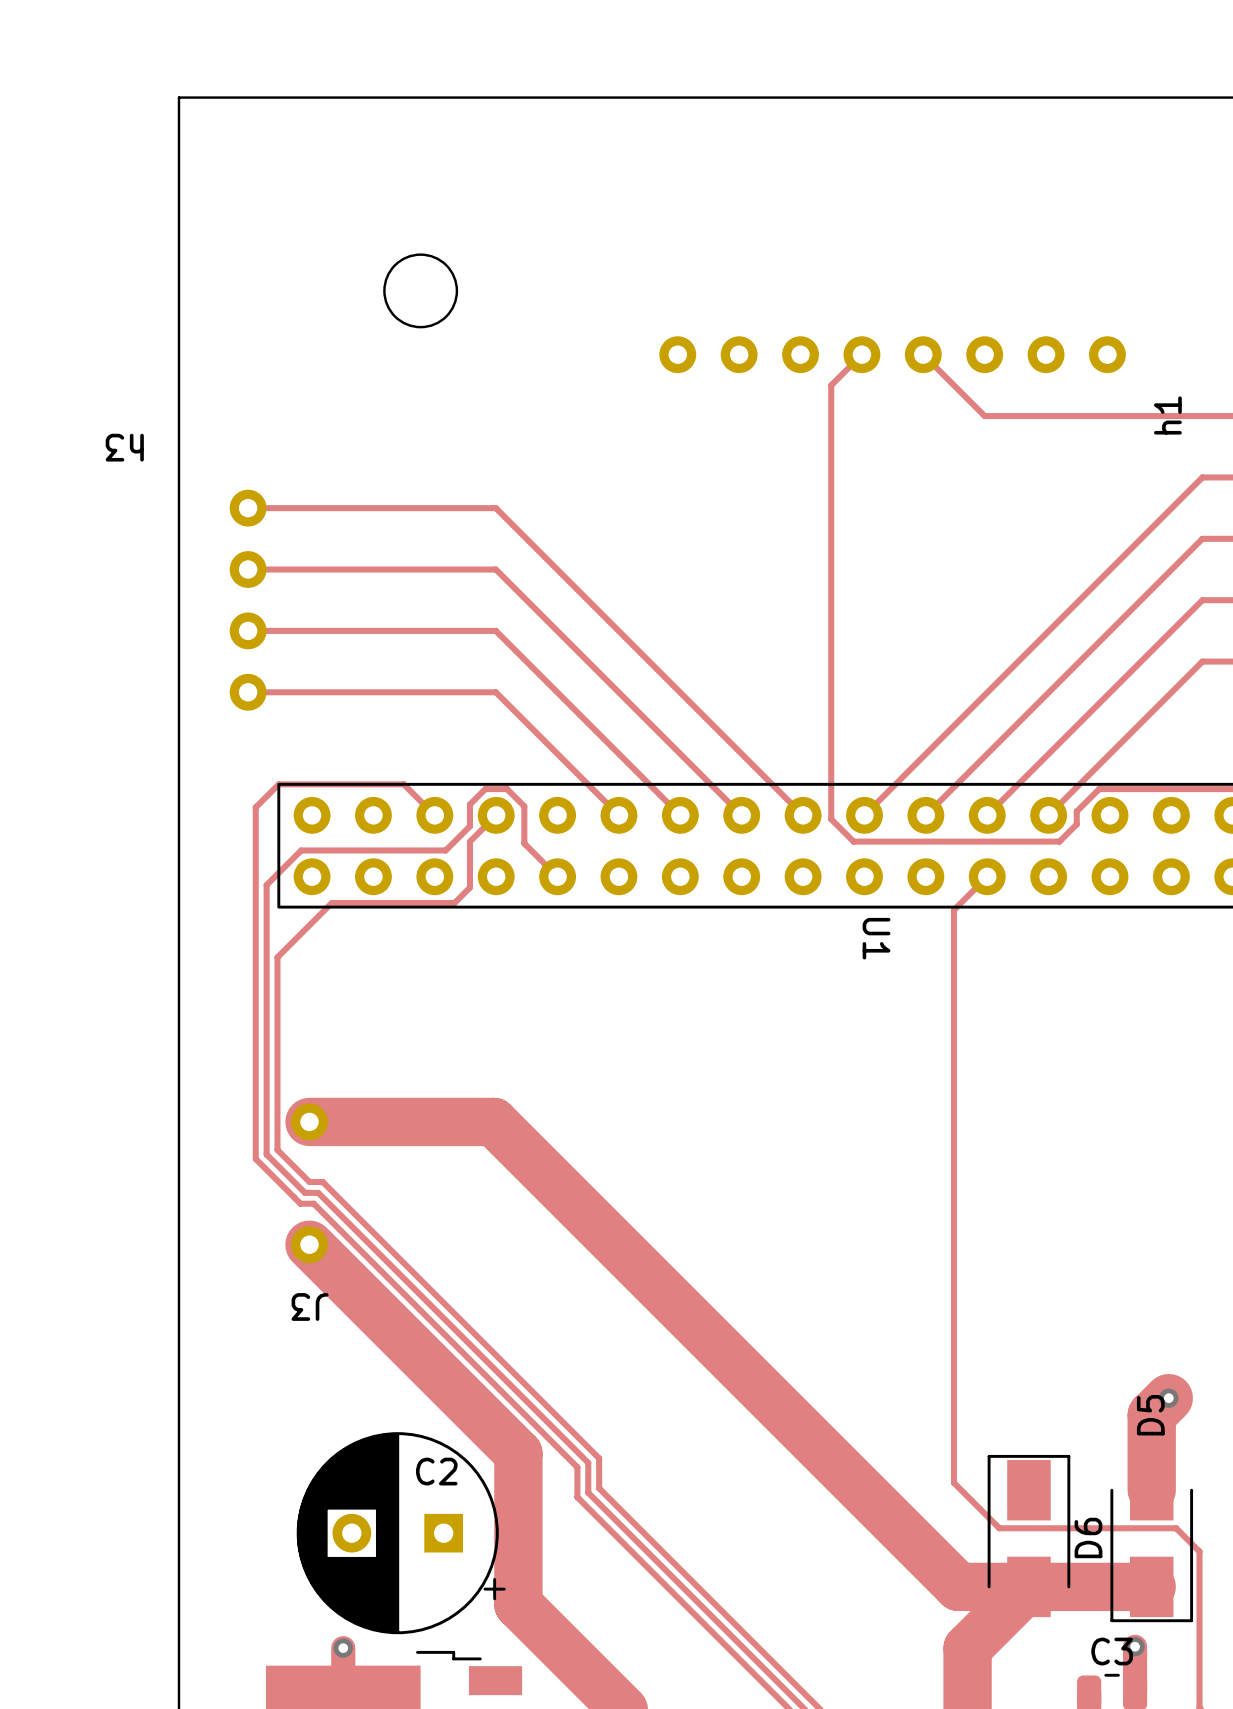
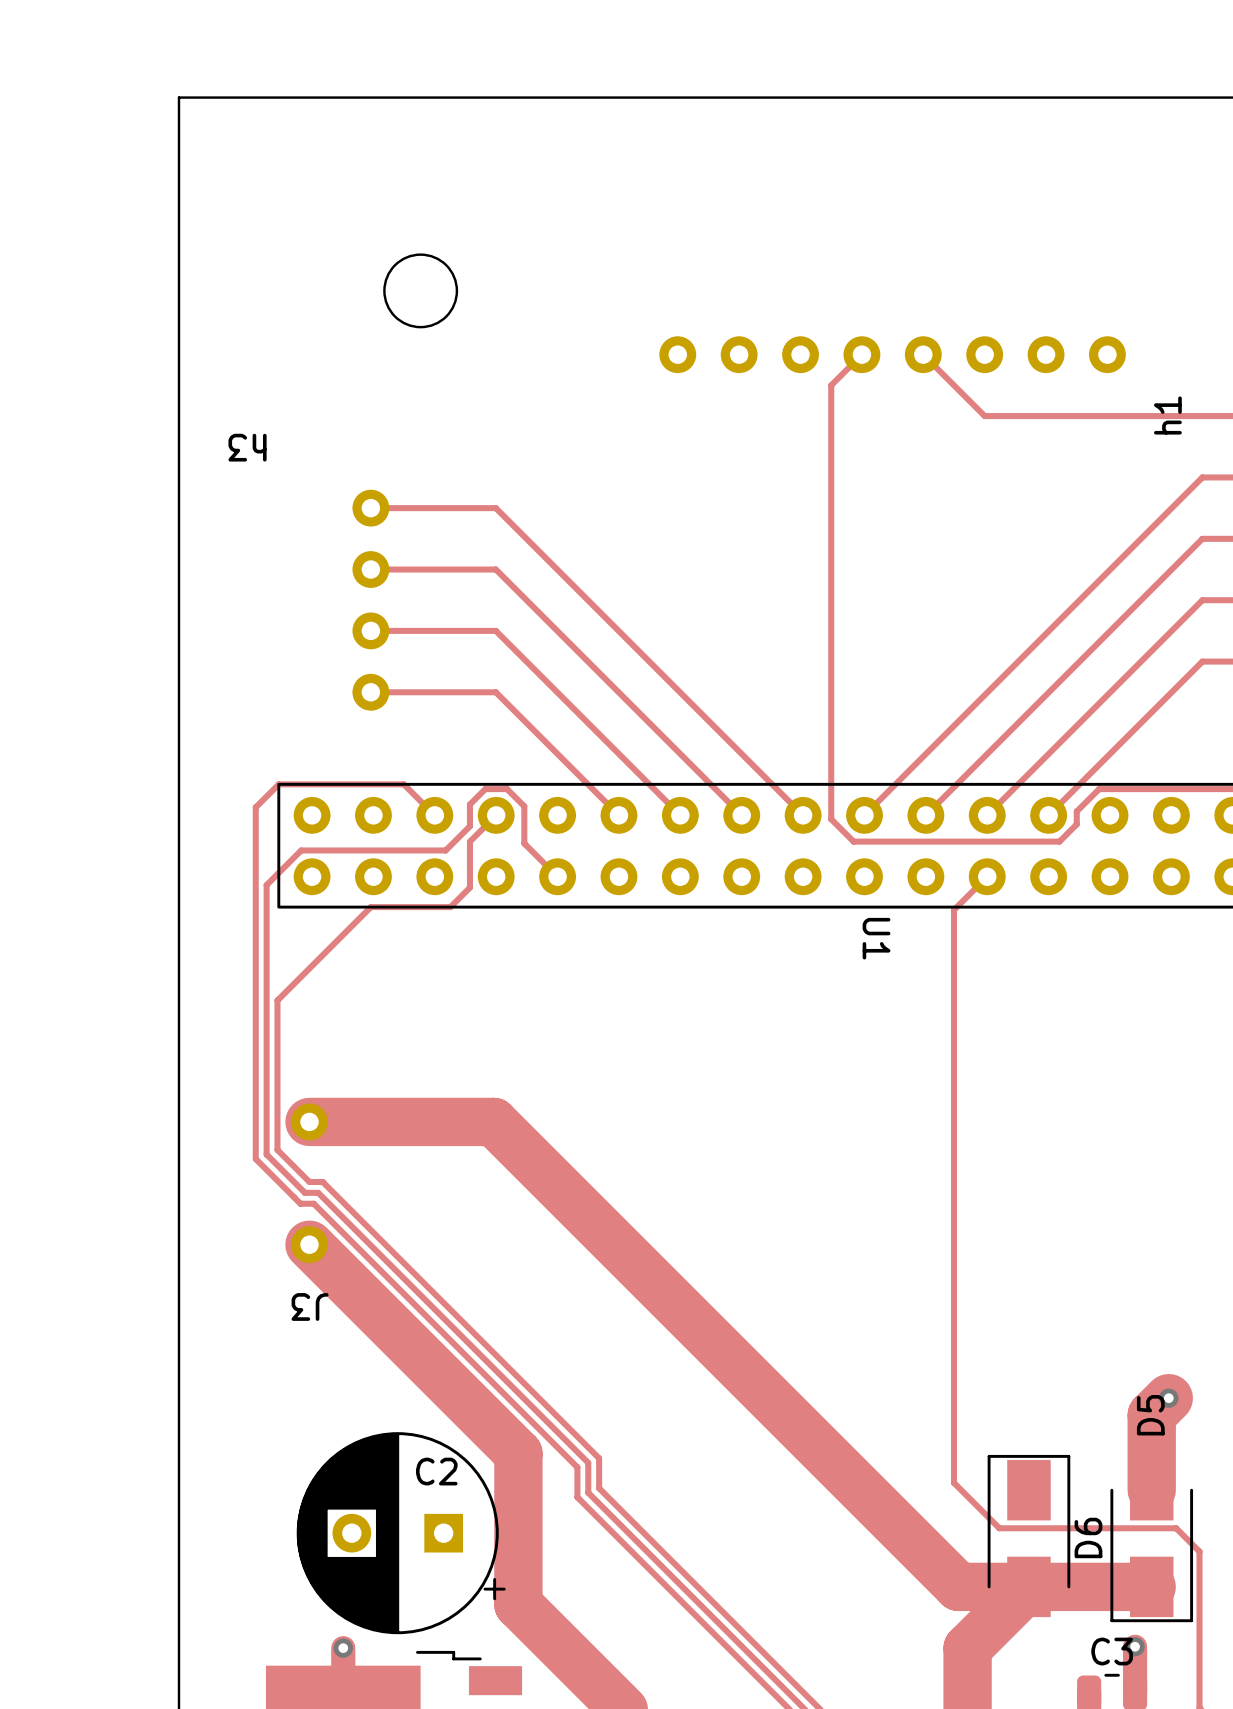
track: (248, 508) (370, 508) -> none
track: (248, 569) (370, 569) -> none
h3 position: (248, 600) -> (370, 600)
track: (248, 630) (370, 630) -> none
track: (248, 692) (370, 692) -> none
track: (454, 902) (331, 902) (277, 957) (277, 1000) -> (454, 902) (450, 907) (370, 907) (277, 1000)

